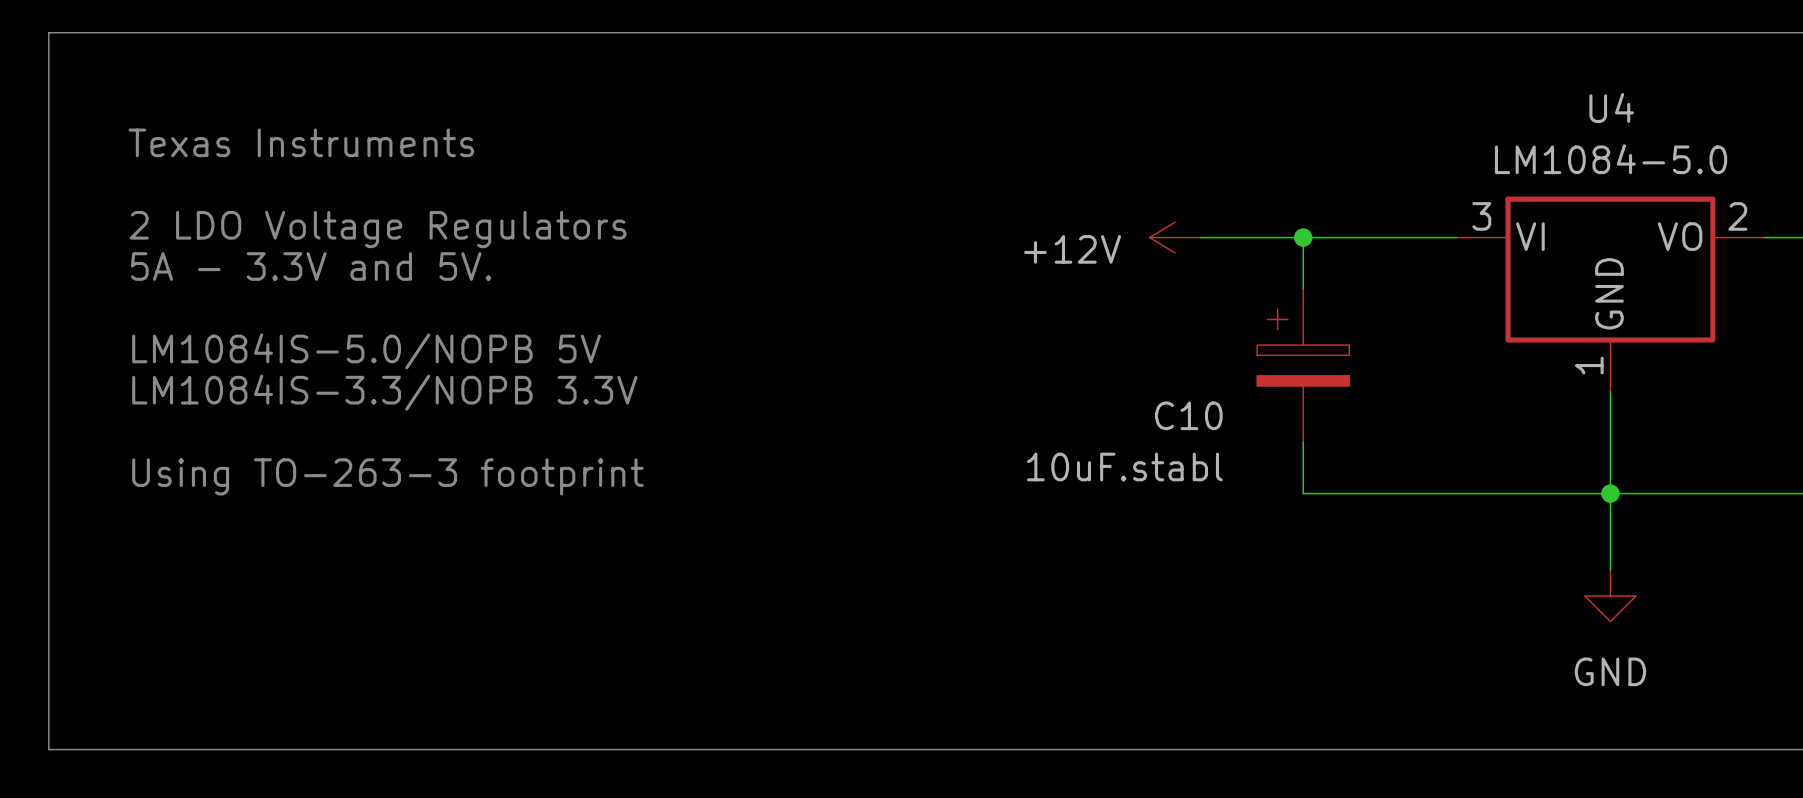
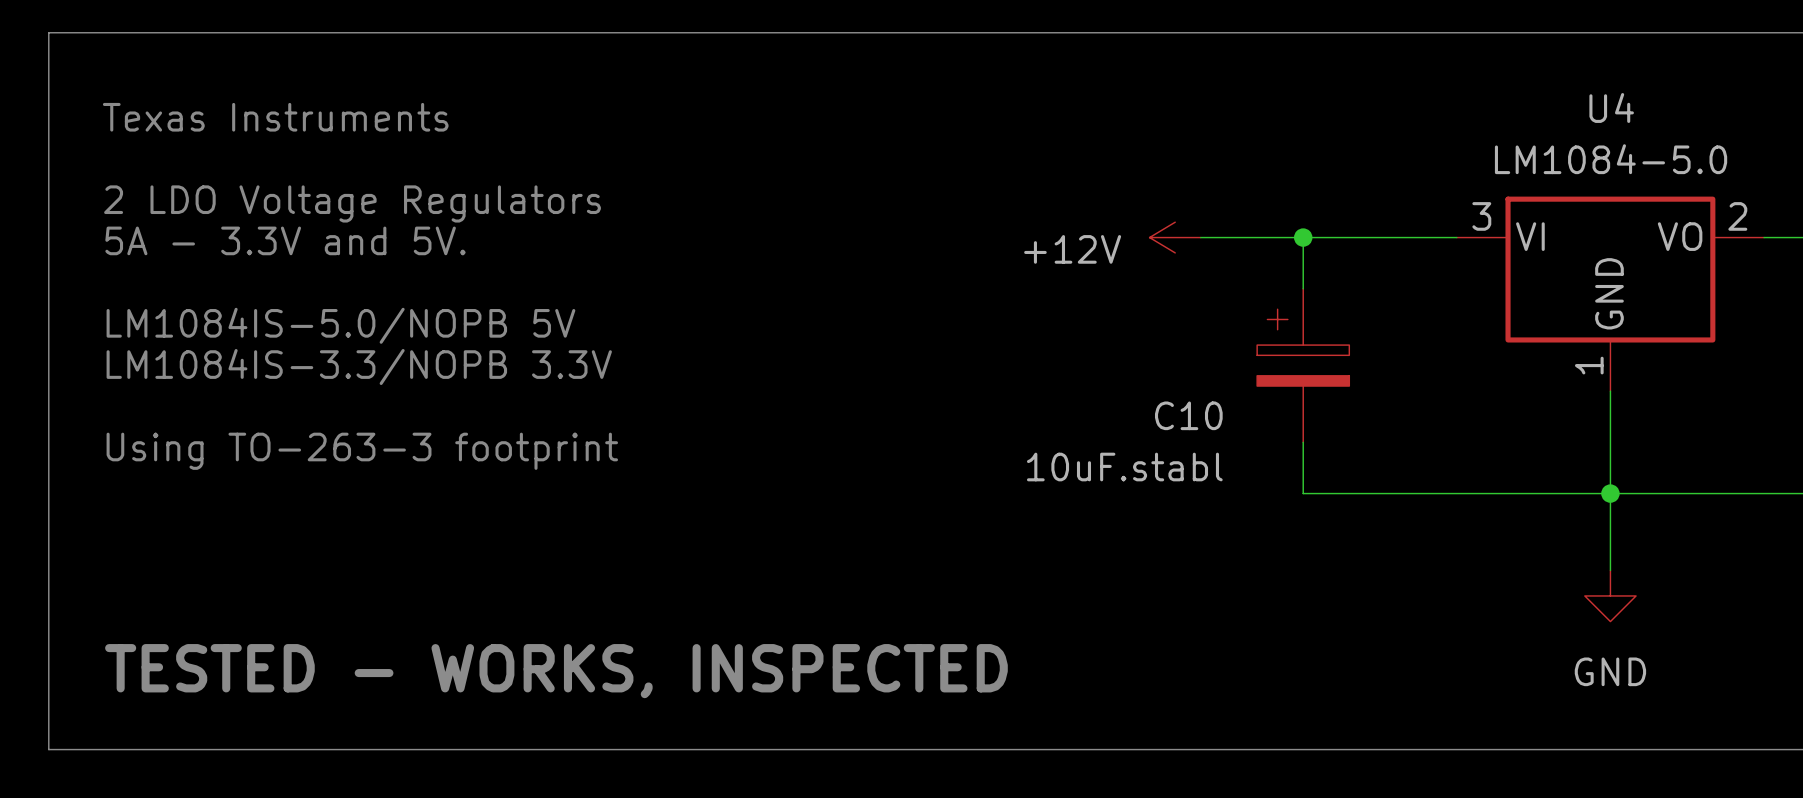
text position: Texas Instruments (301, 142) -> Texas Instruments (275, 117)
text position: 2 LDO Voltage Regulators (378, 229) -> 2 LDO Voltage Regulators (352, 203)
text position: 5A - 3.3V and 5V. (311, 266) -> 5A - 3.3V and 5V. (285, 240)
text position: LM1084IS-5.0/NOPB 5V (366, 351) -> LM1084IS-5.0/NOPB 5V (340, 325)
text position: LM1084IS-3.3/NOPB 3.3V (384, 392) -> LM1084IS-3.3/NOPB 3.3V (359, 367)
text position: Using TO-263-3 footprint (387, 476) -> Using TO-263-3 footprint (362, 451)
text: none -> TESTED - WORKS, INSPECTED (556, 671)

